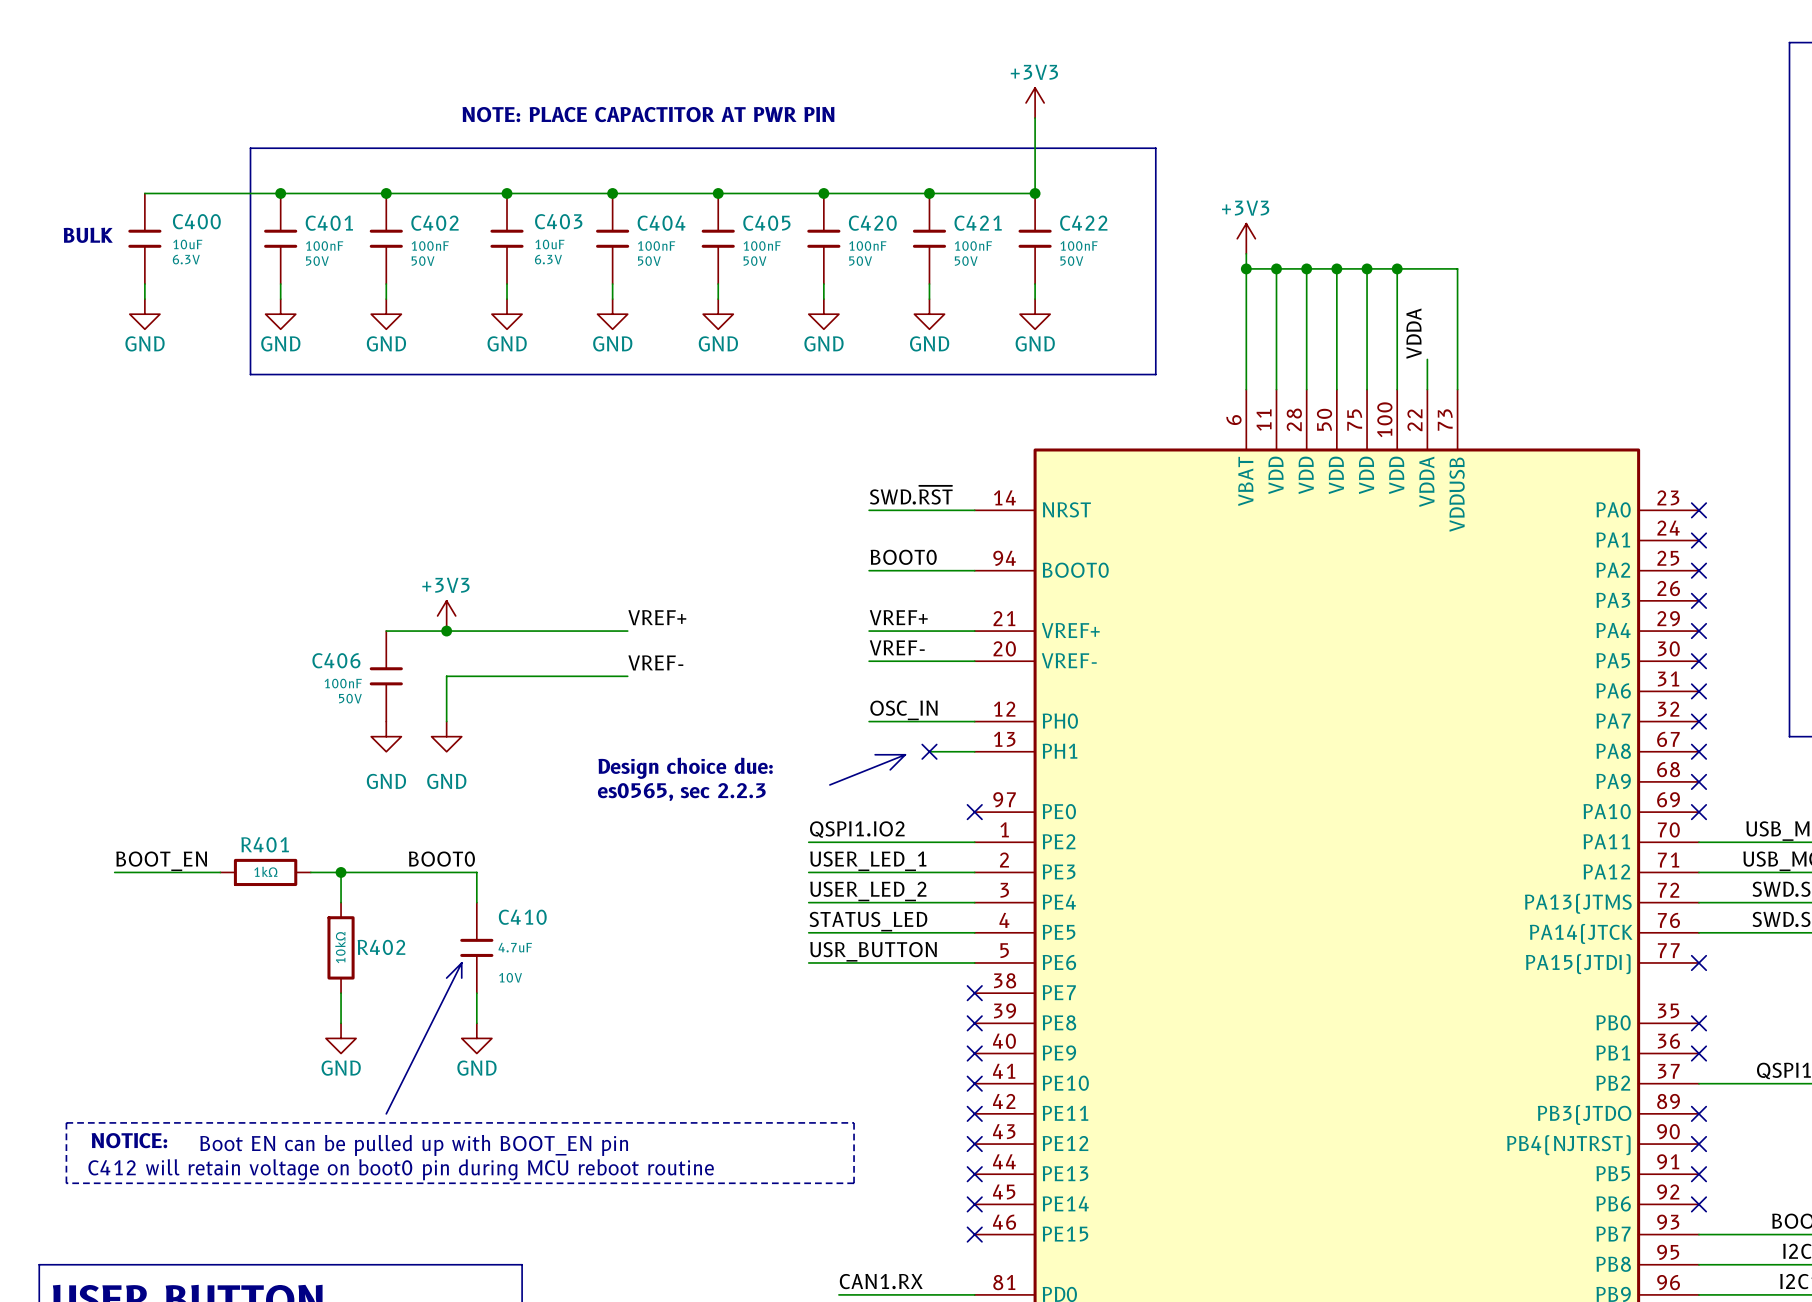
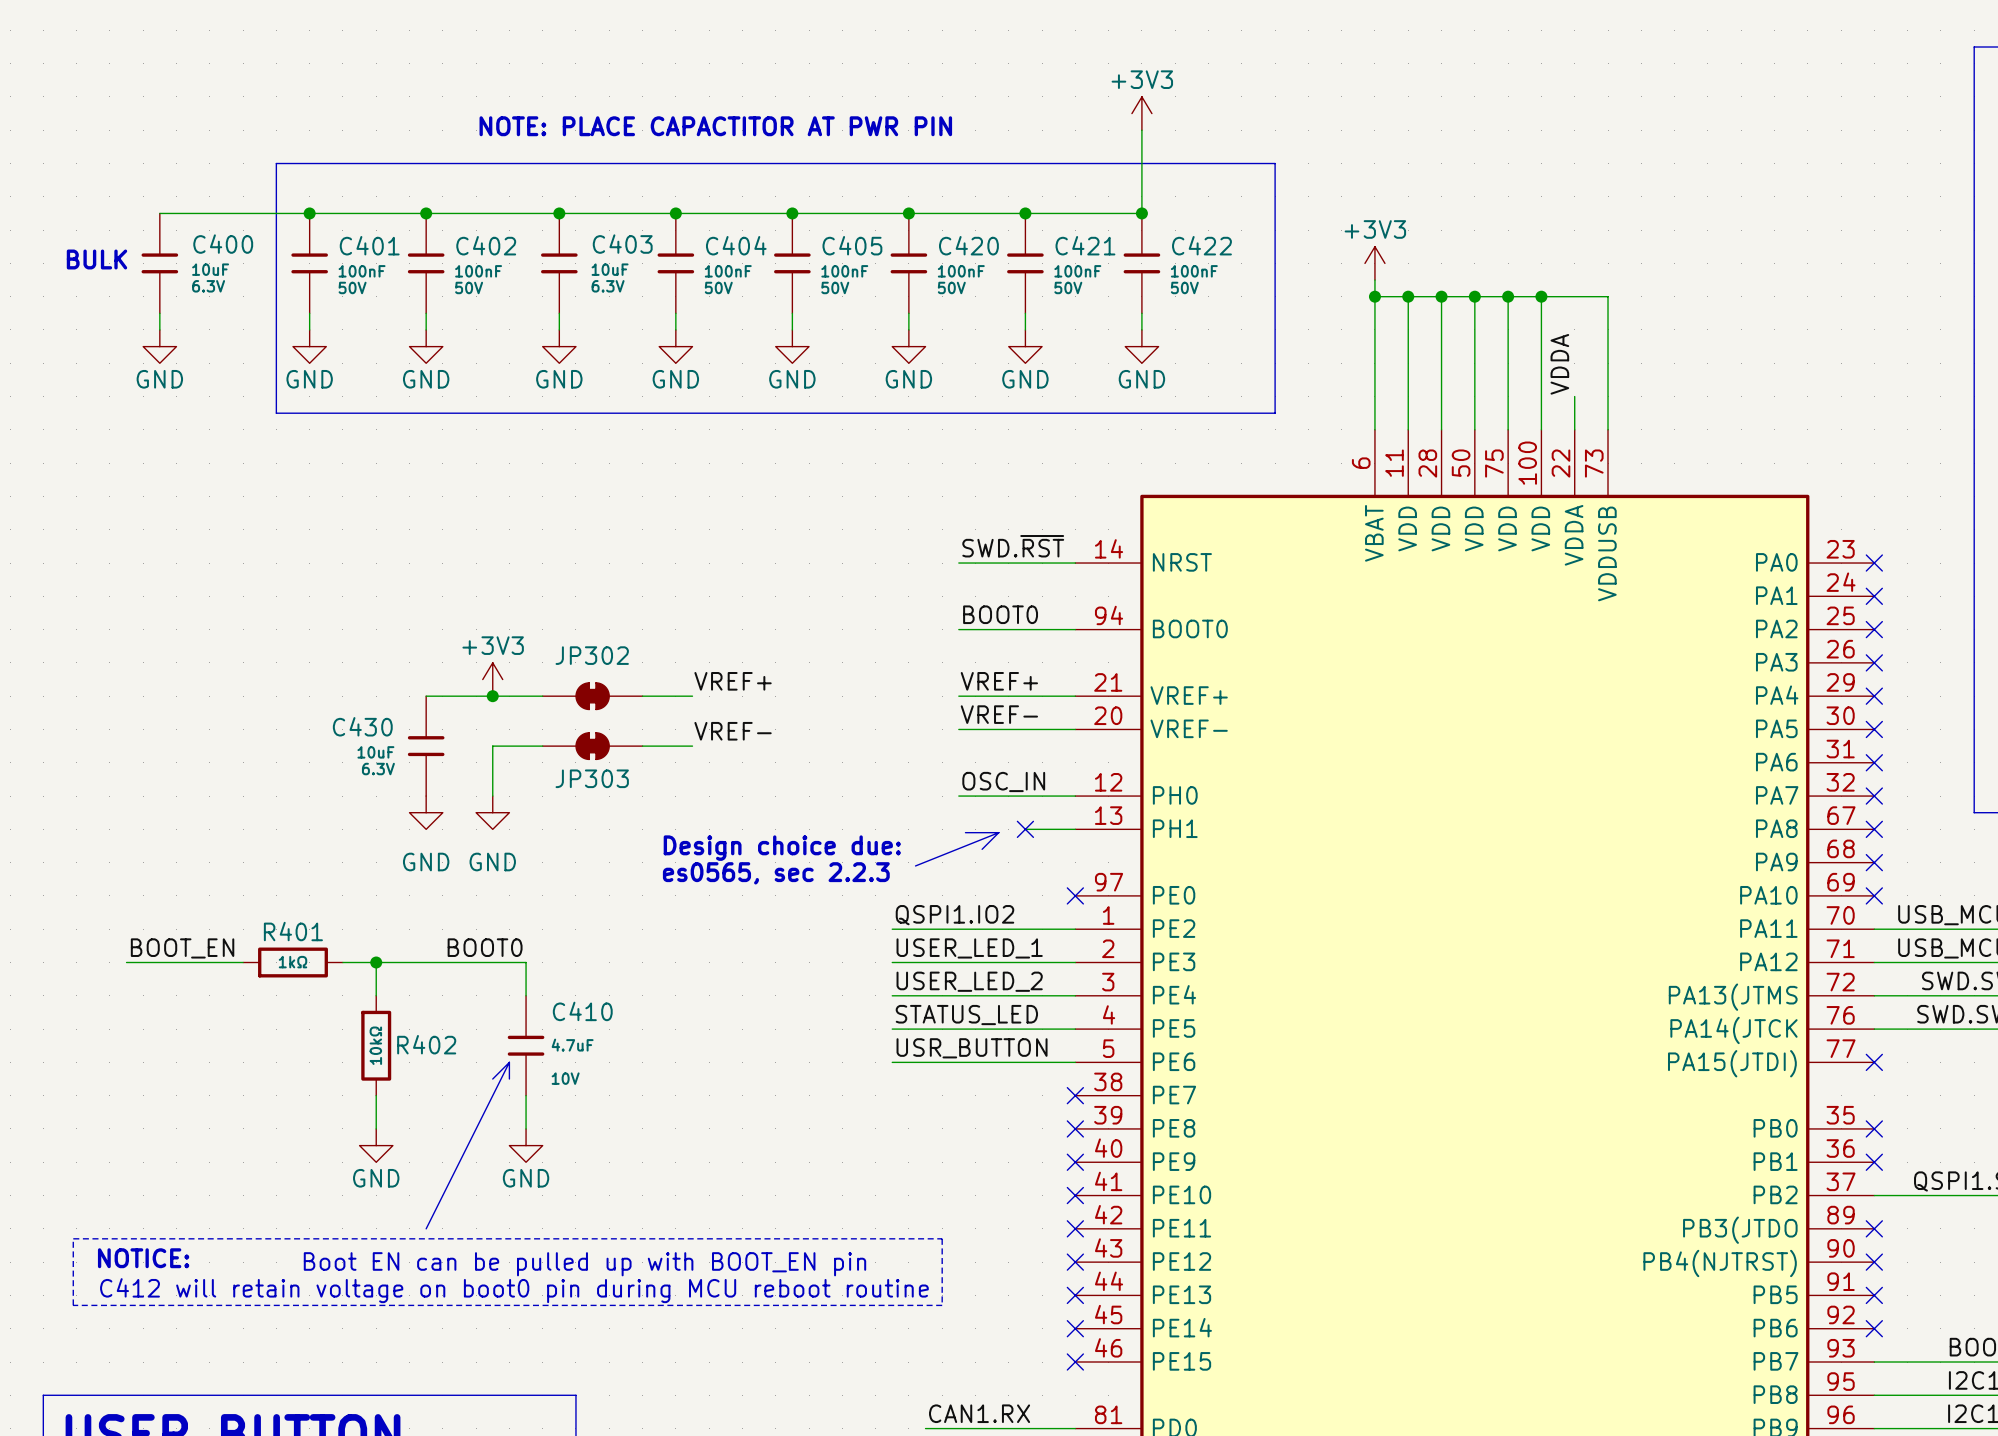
JP302: none -> (592, 696)
C406 name: C406 (336, 660) -> C430 (362, 726)
JP303: none -> (592, 746)
C406 value: 100nF (343, 683) -> 10uF (375, 752)
C406 text: 50V (350, 698) -> 6.3V (378, 769)

